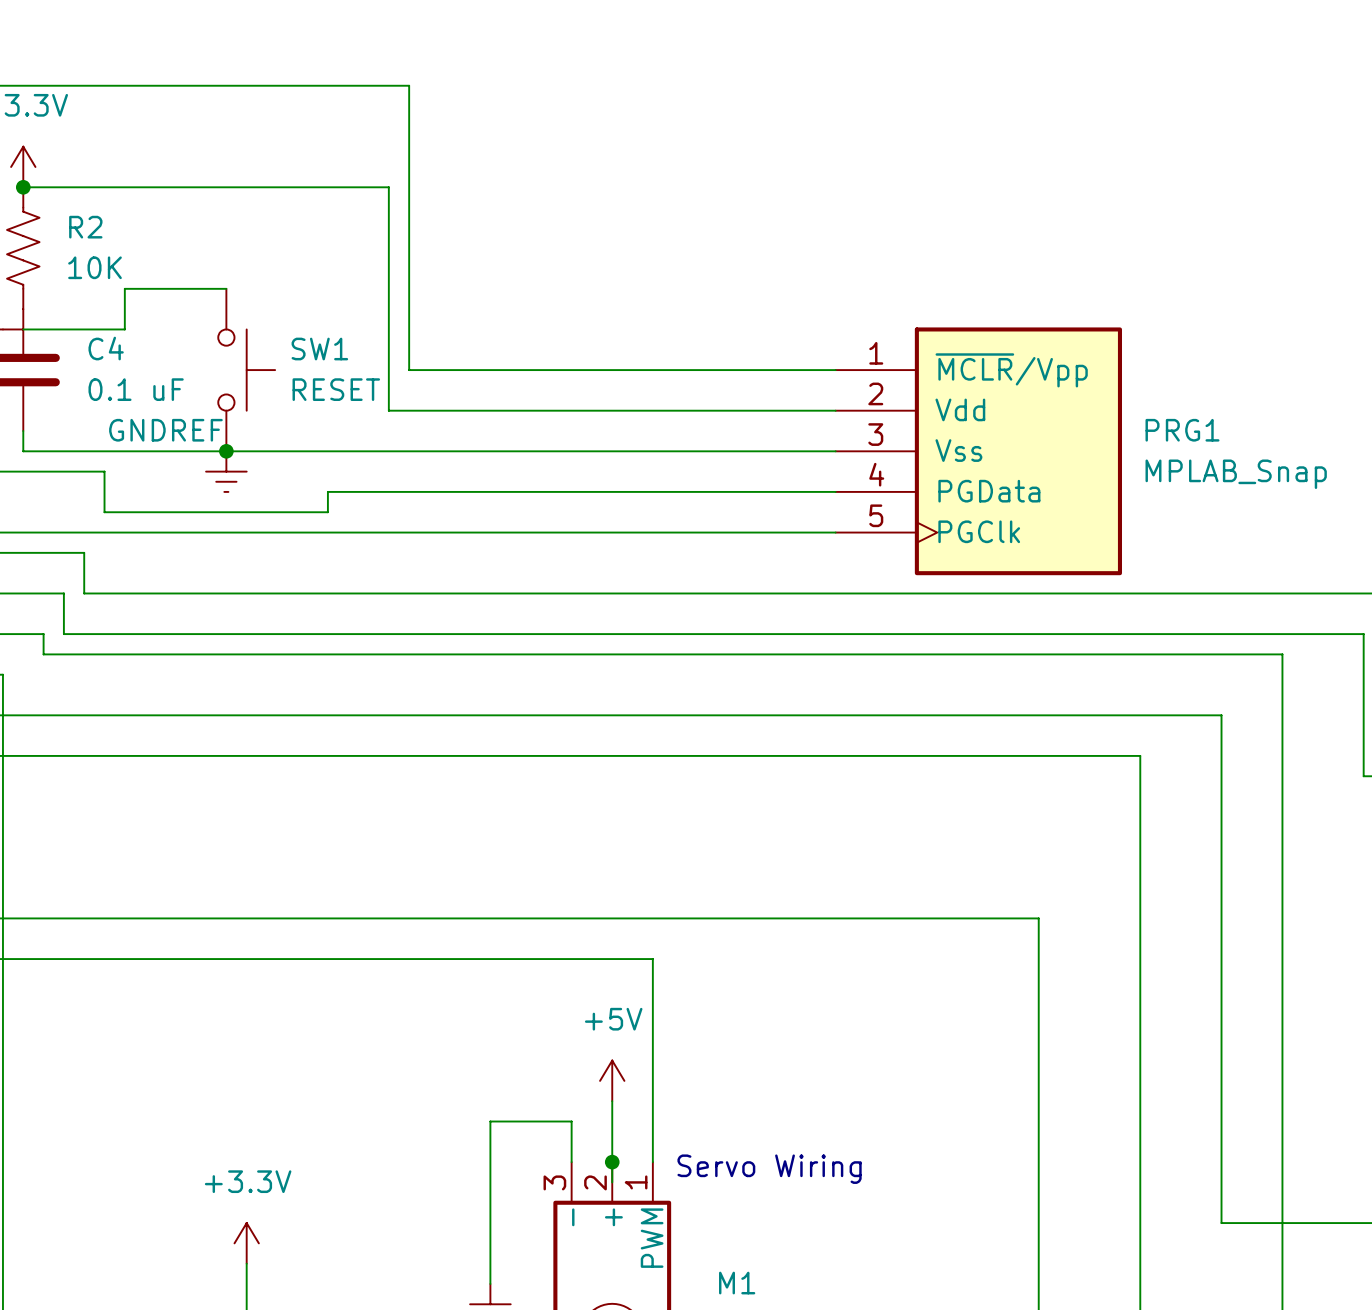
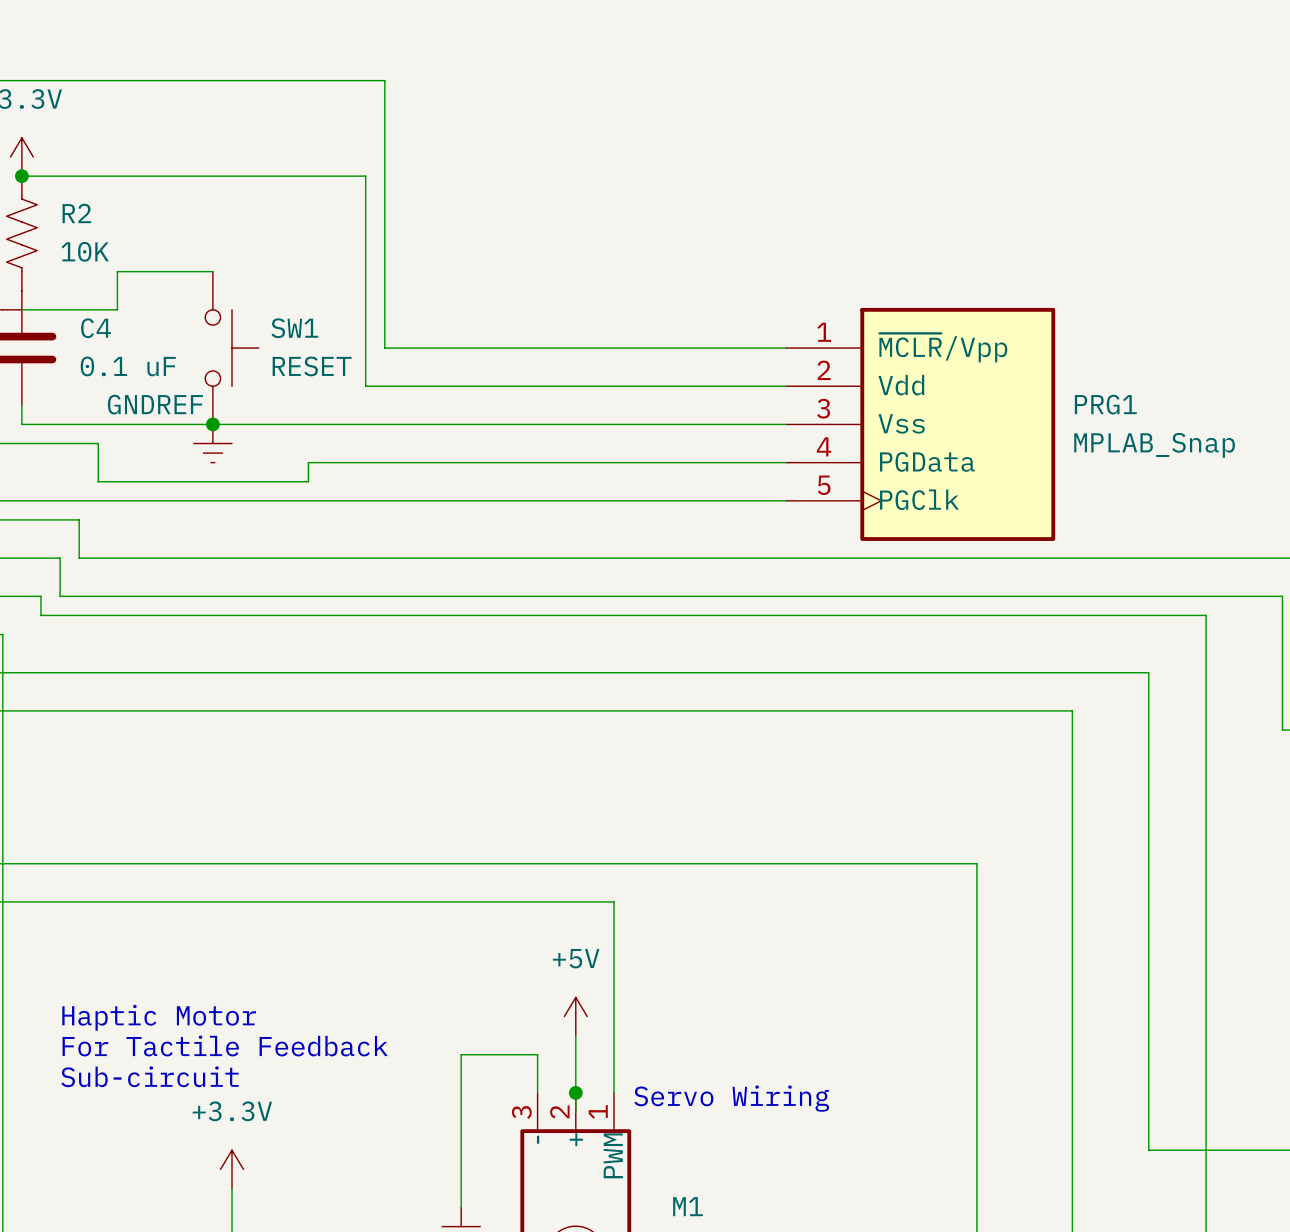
text: none -> Haptic Motor (159, 1017)
text: none -> For Tactile Feedback (225, 1046)
text: none -> Sub-circuit (150, 1076)

